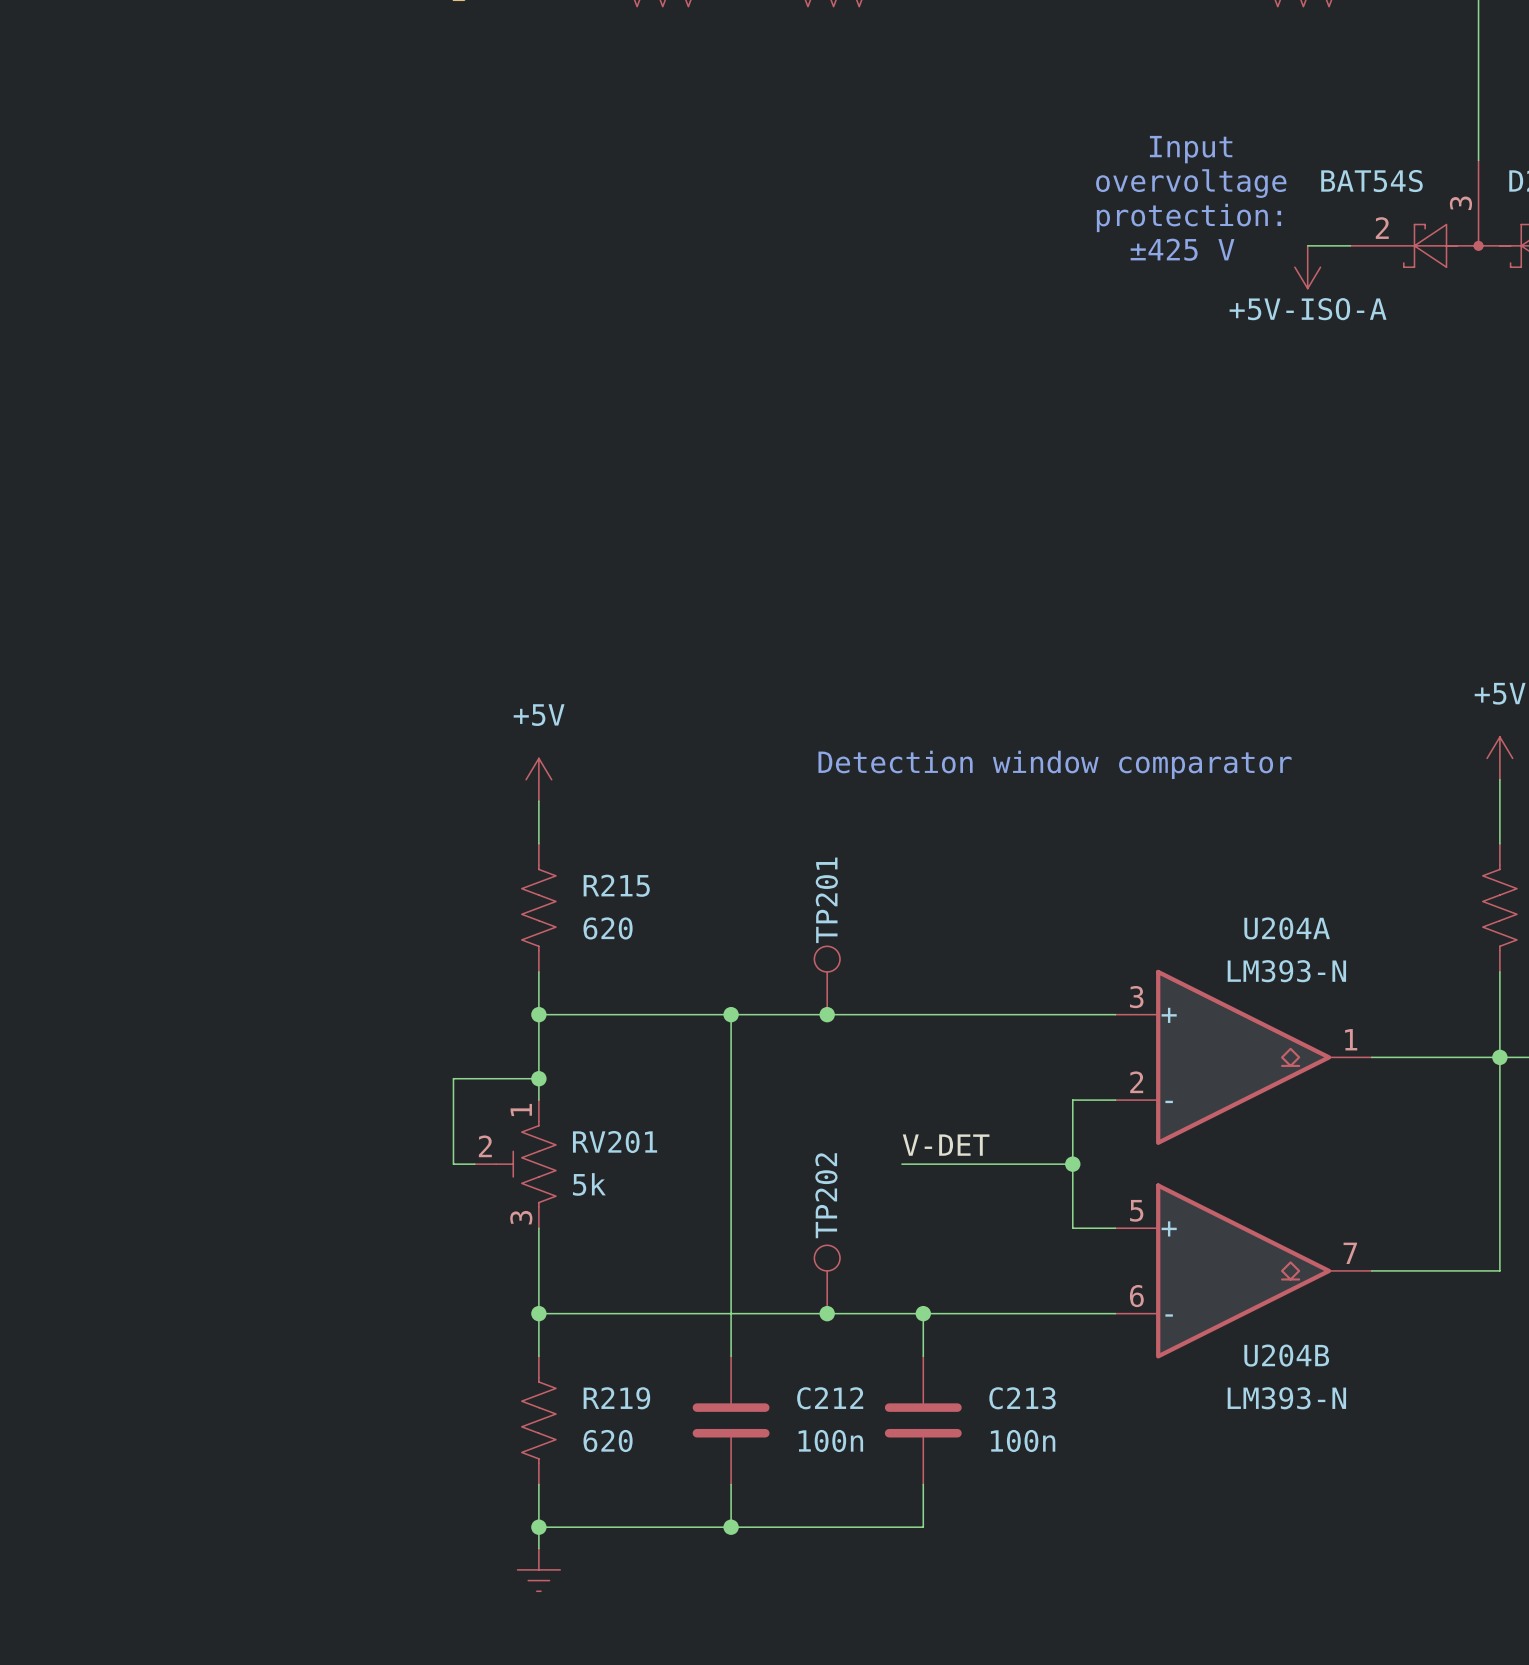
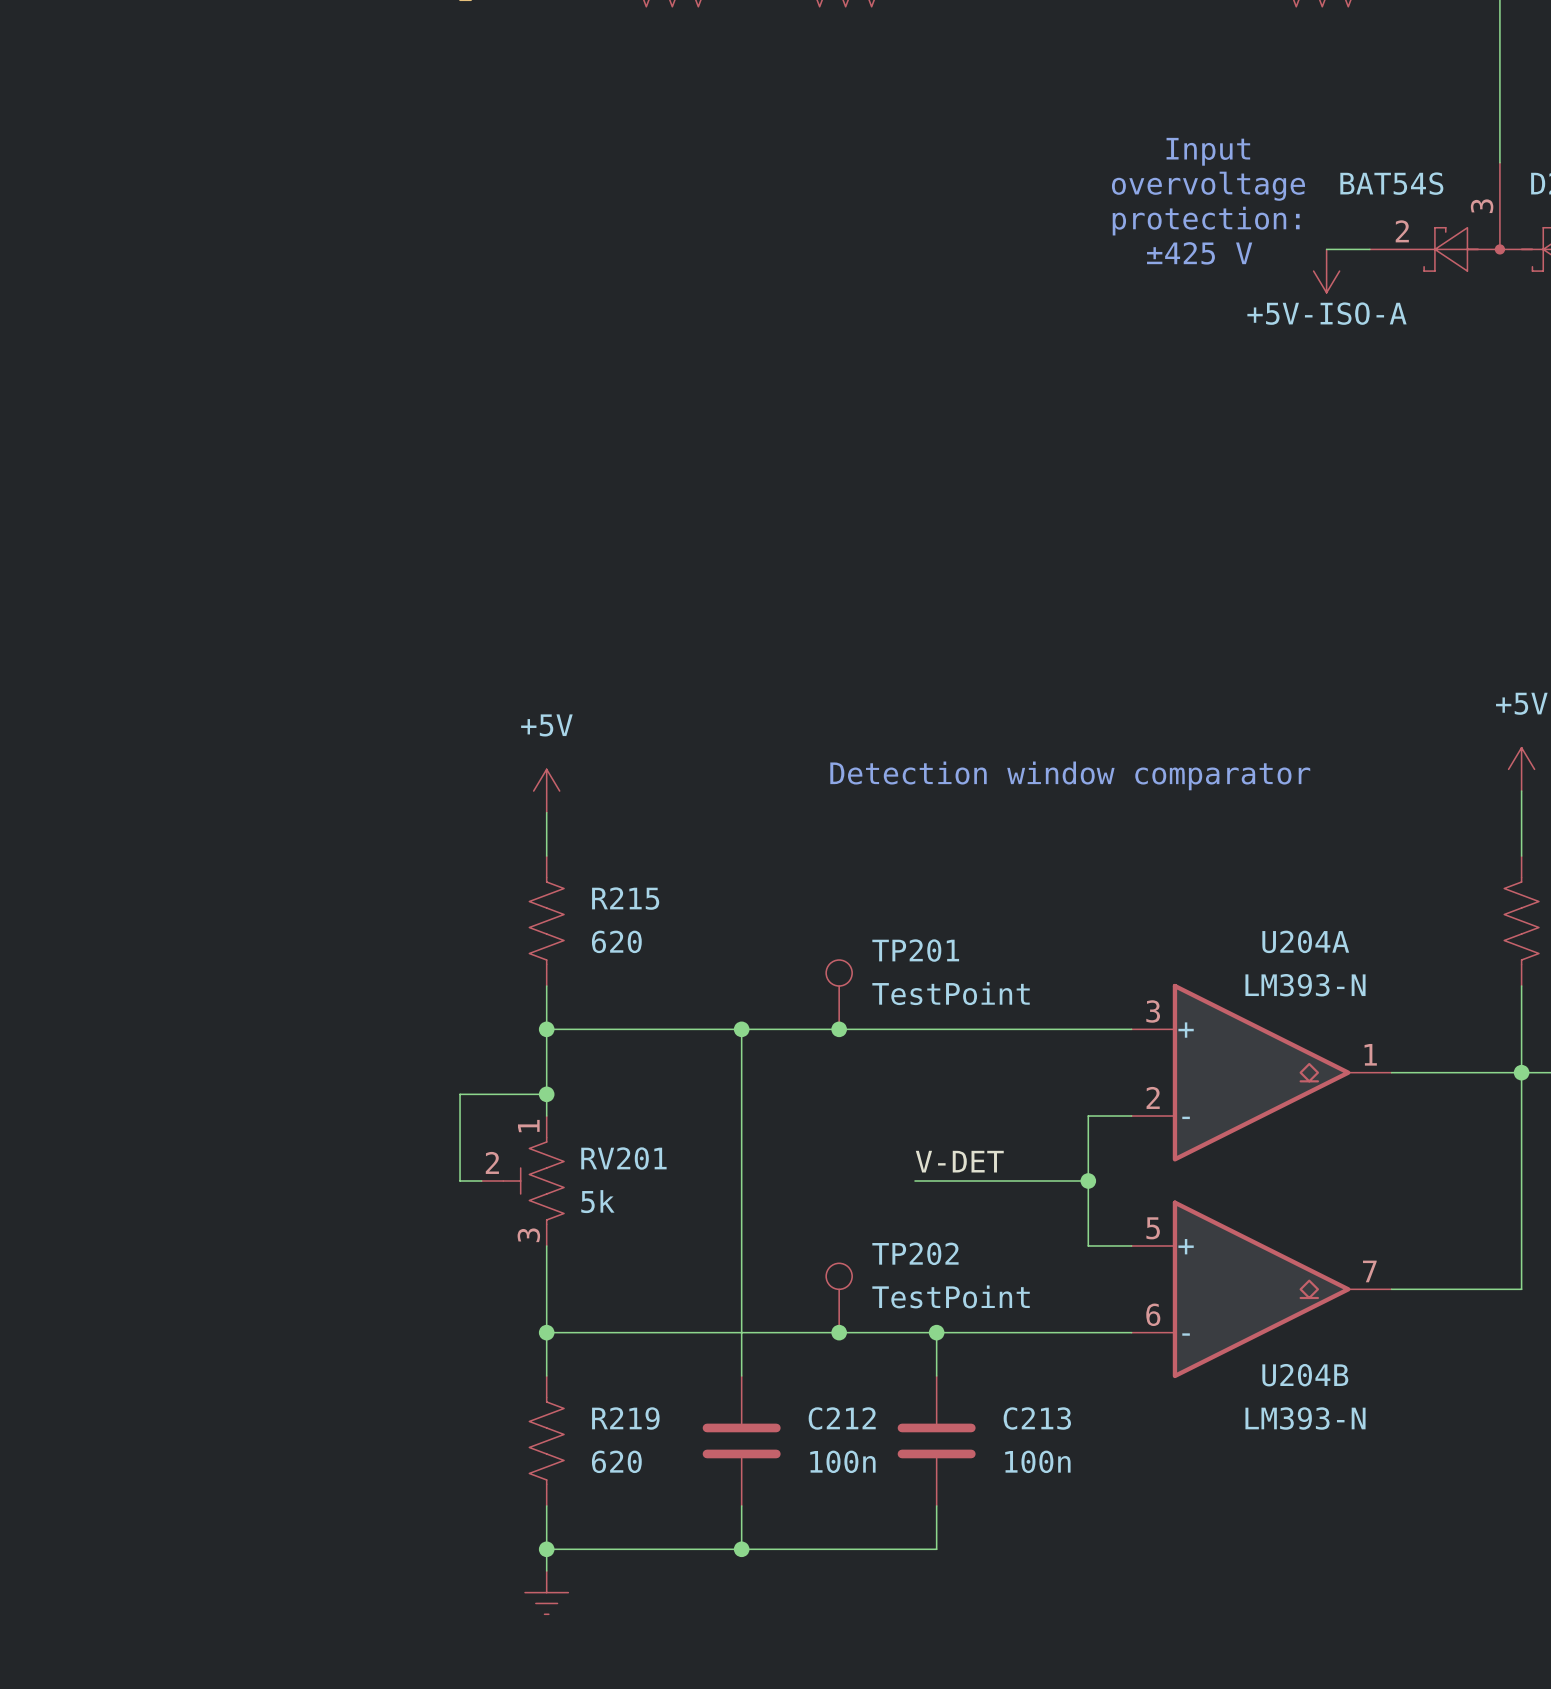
TP201 name rotation: 0° (826, 900) -> 90° clockwise (915, 950)
TP201 value: none -> TestPoint (951, 993)
TP202 name rotation: 0° (826, 1195) -> 90° clockwise (915, 1253)
TP202 value: none -> TestPoint (951, 1296)

